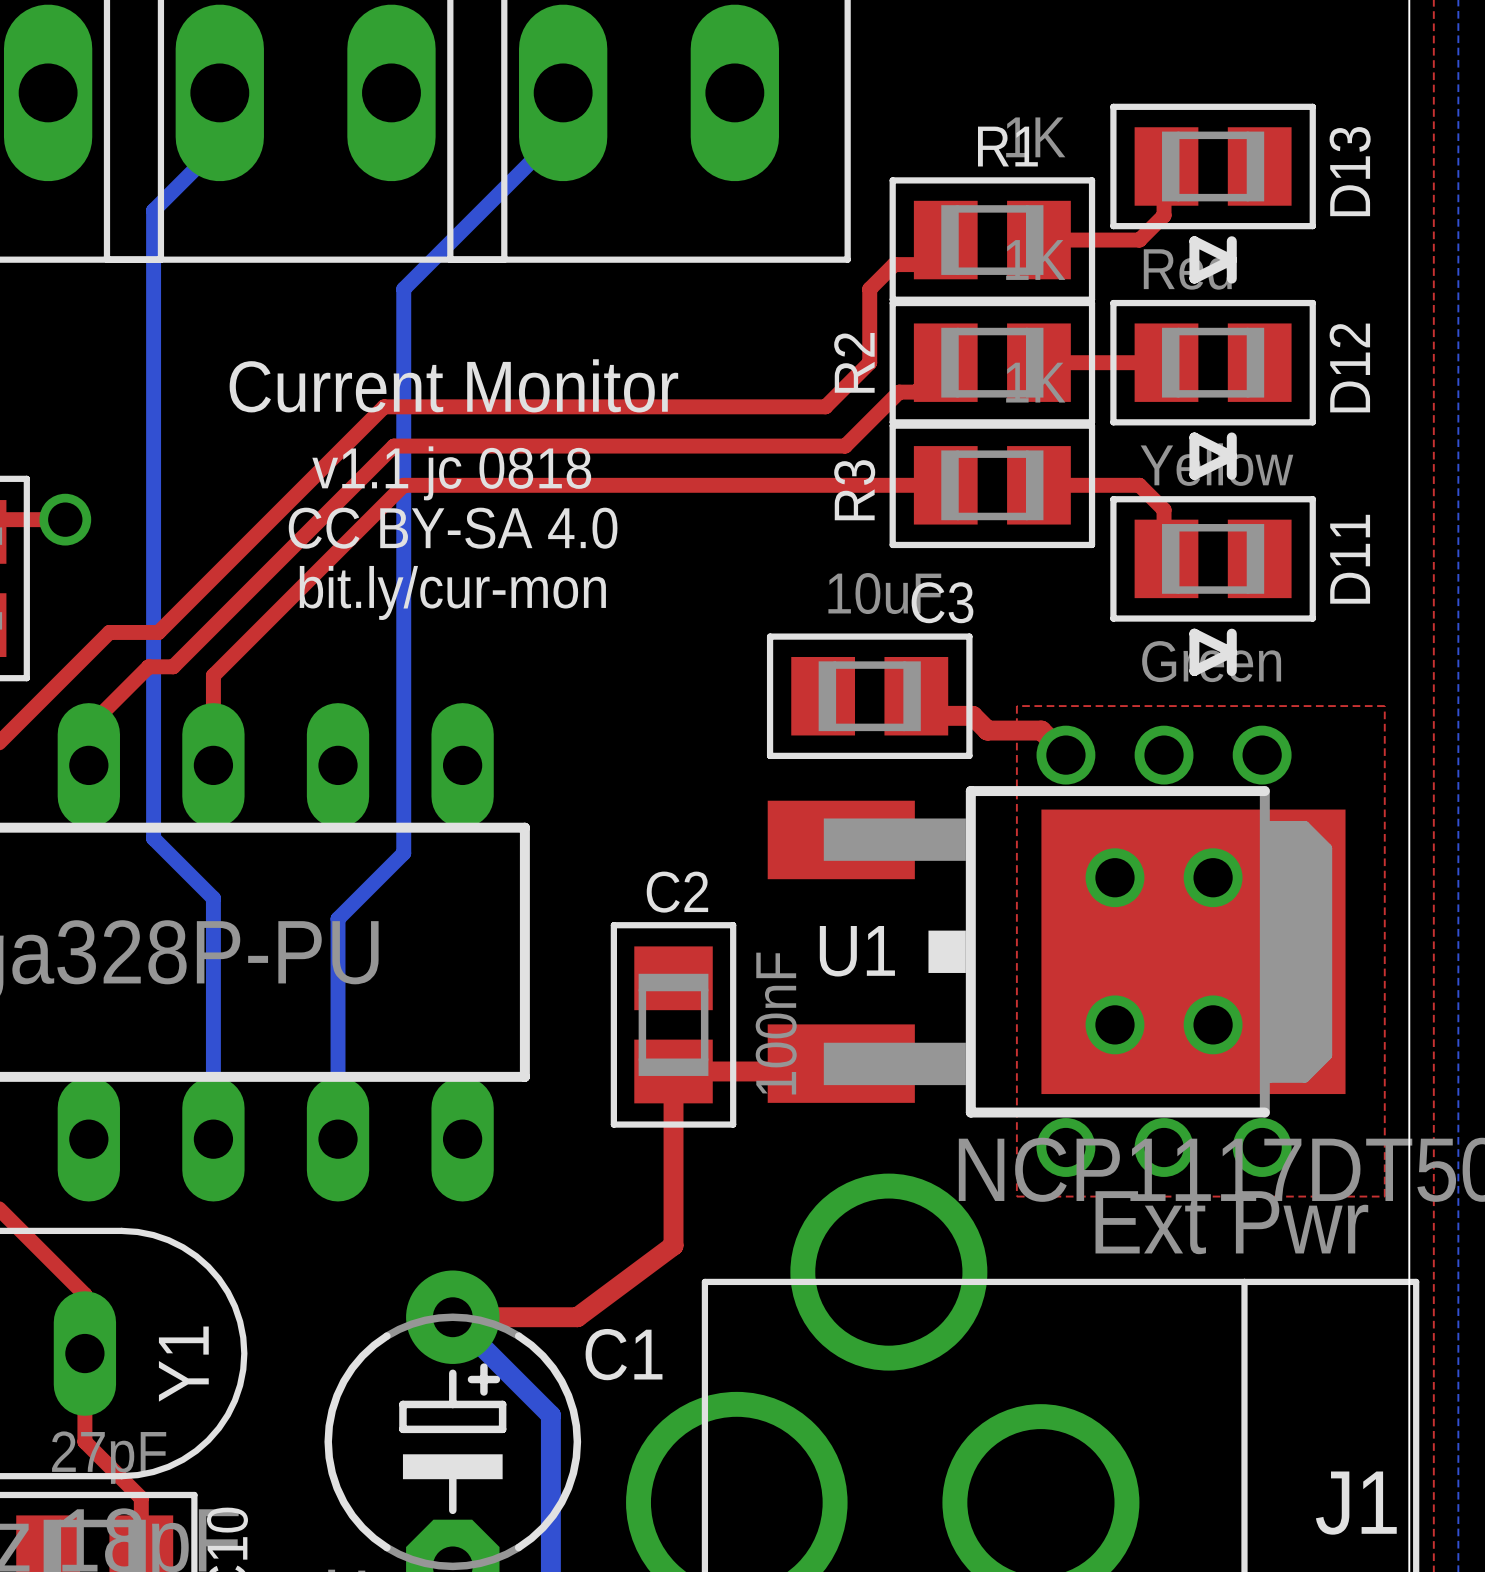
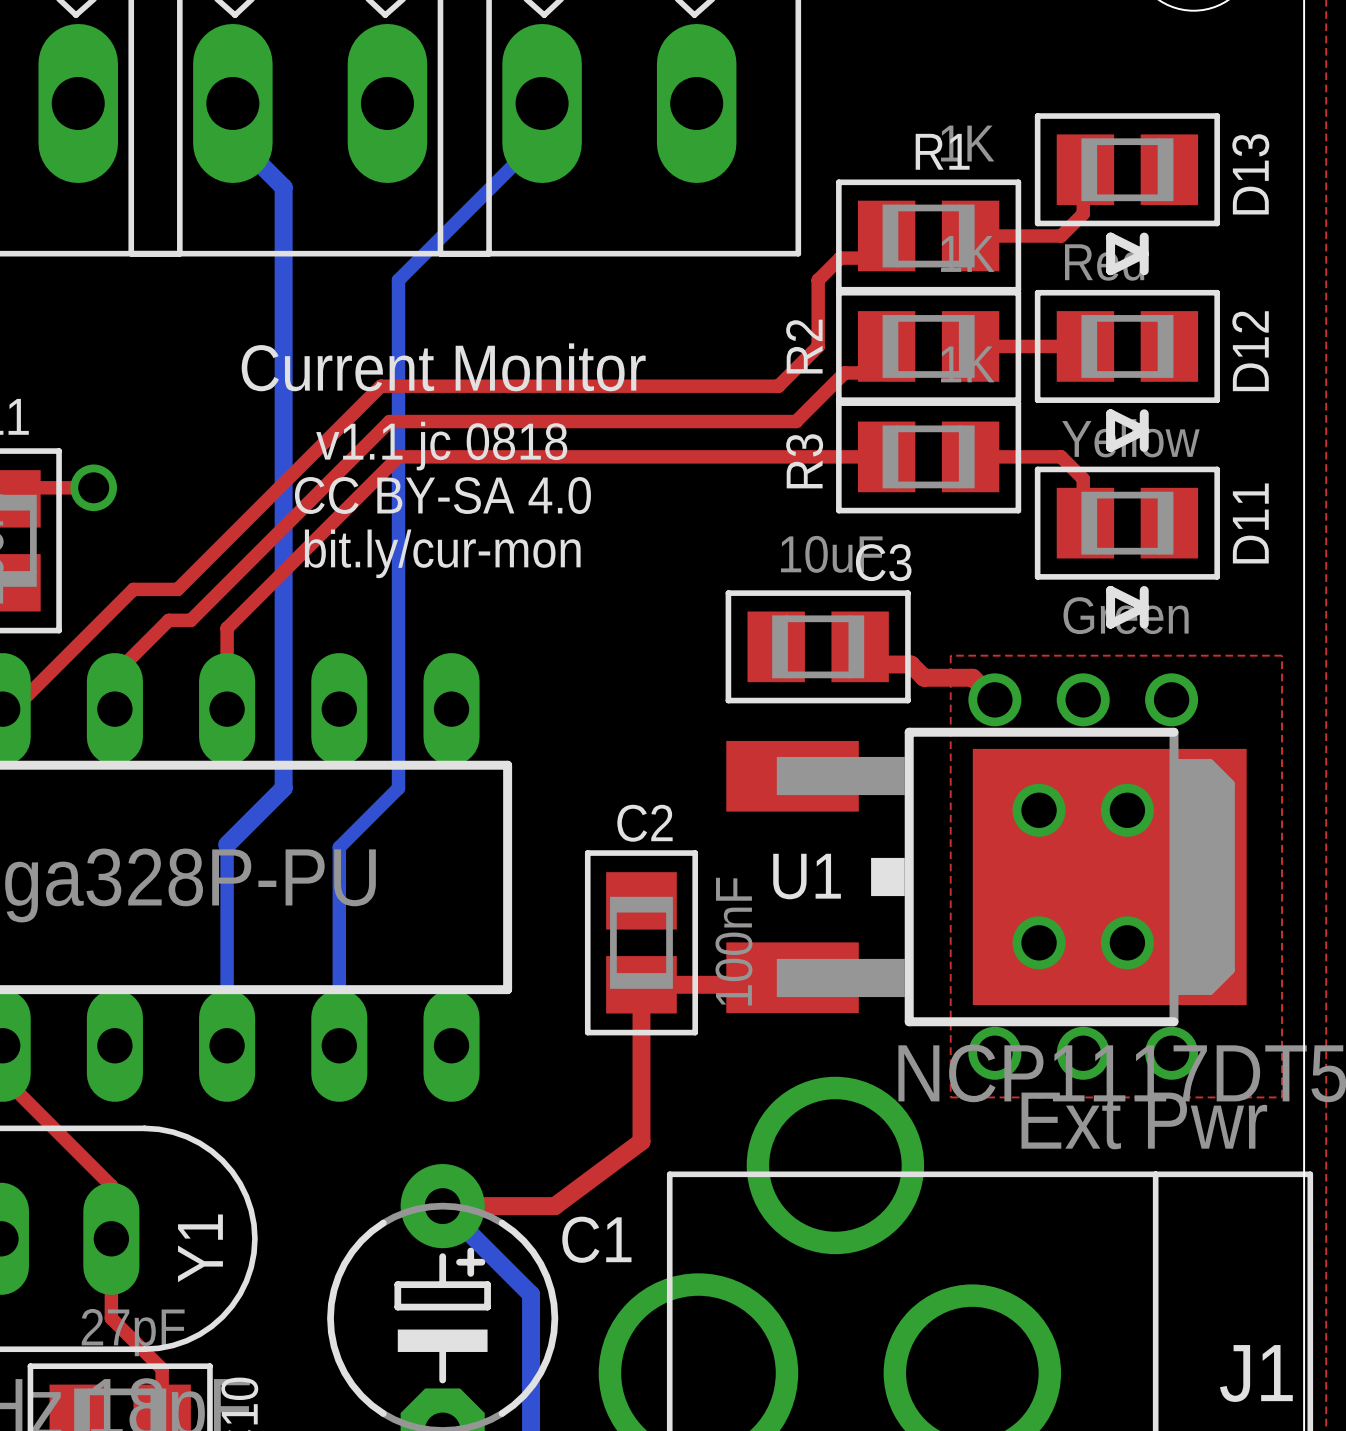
bottom track: (219, 92) (217, 95) (217, 146) (153, 210) (153, 838) (213, 898) (213, 915) -> (232, 103) (243, 114) (243, 147) (283, 187) (283, 788) (227, 844)

